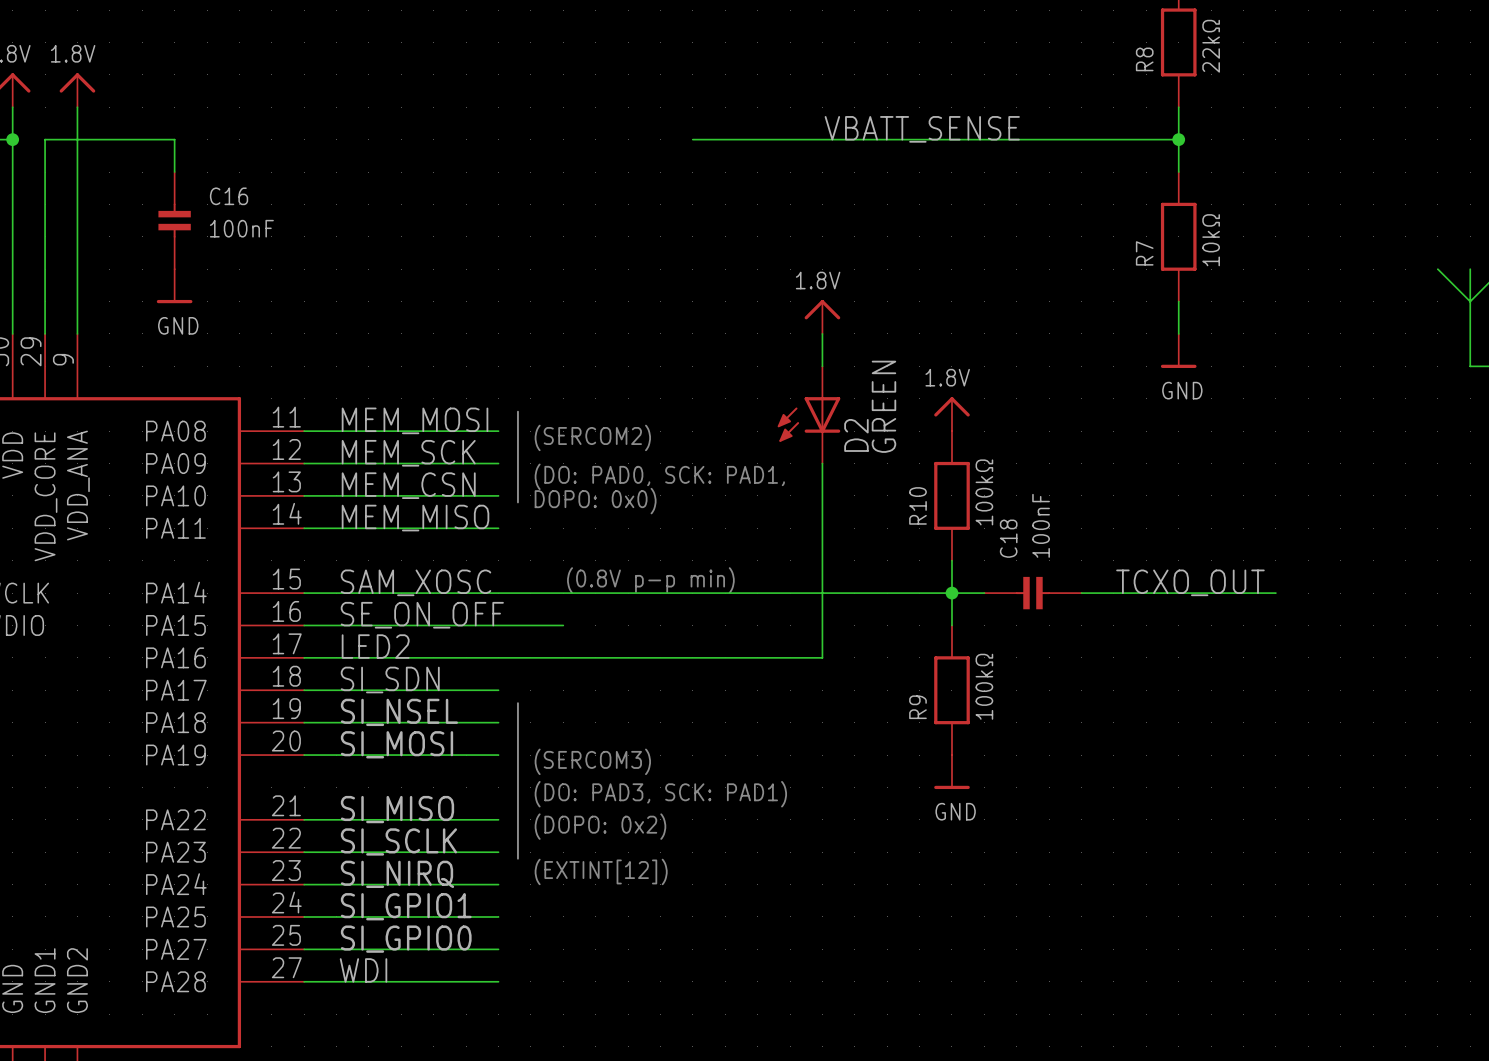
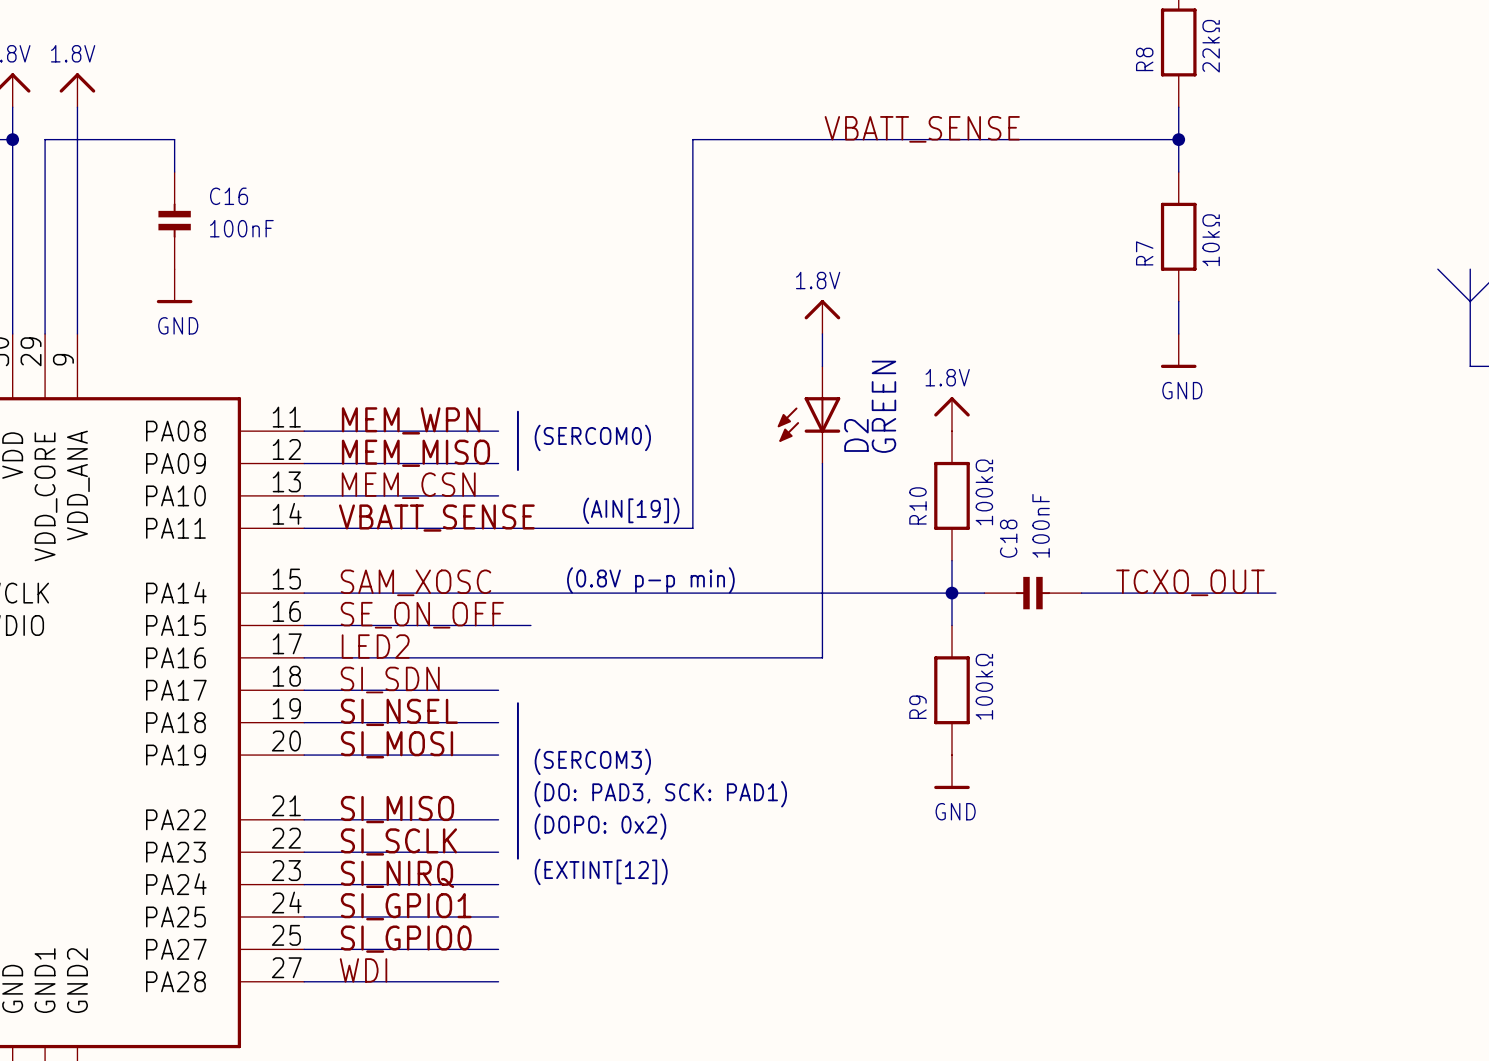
wire: none -> (692, 139) (692, 528) (498, 528)
label: MEM_MOSI (415, 420) -> MEM_WPN (411, 420)
text: (SERCOM2) (592, 437) -> (SERCOM0) (592, 437)
label: MEM_SCK (408, 453) -> MEM_MISO (415, 453)
line: (517, 470) (517, 502) -> none
text: (DO: PAD0, SCK: PAD1, (659, 476) -> none
text: DOPO: 0x0) (595, 501) -> none
text: none -> (AIN[19]) (631, 510)
label: MEM_MISO (415, 518) -> VBATT_SENSE (436, 518)
wire: (530, 625) (563, 625) -> none

